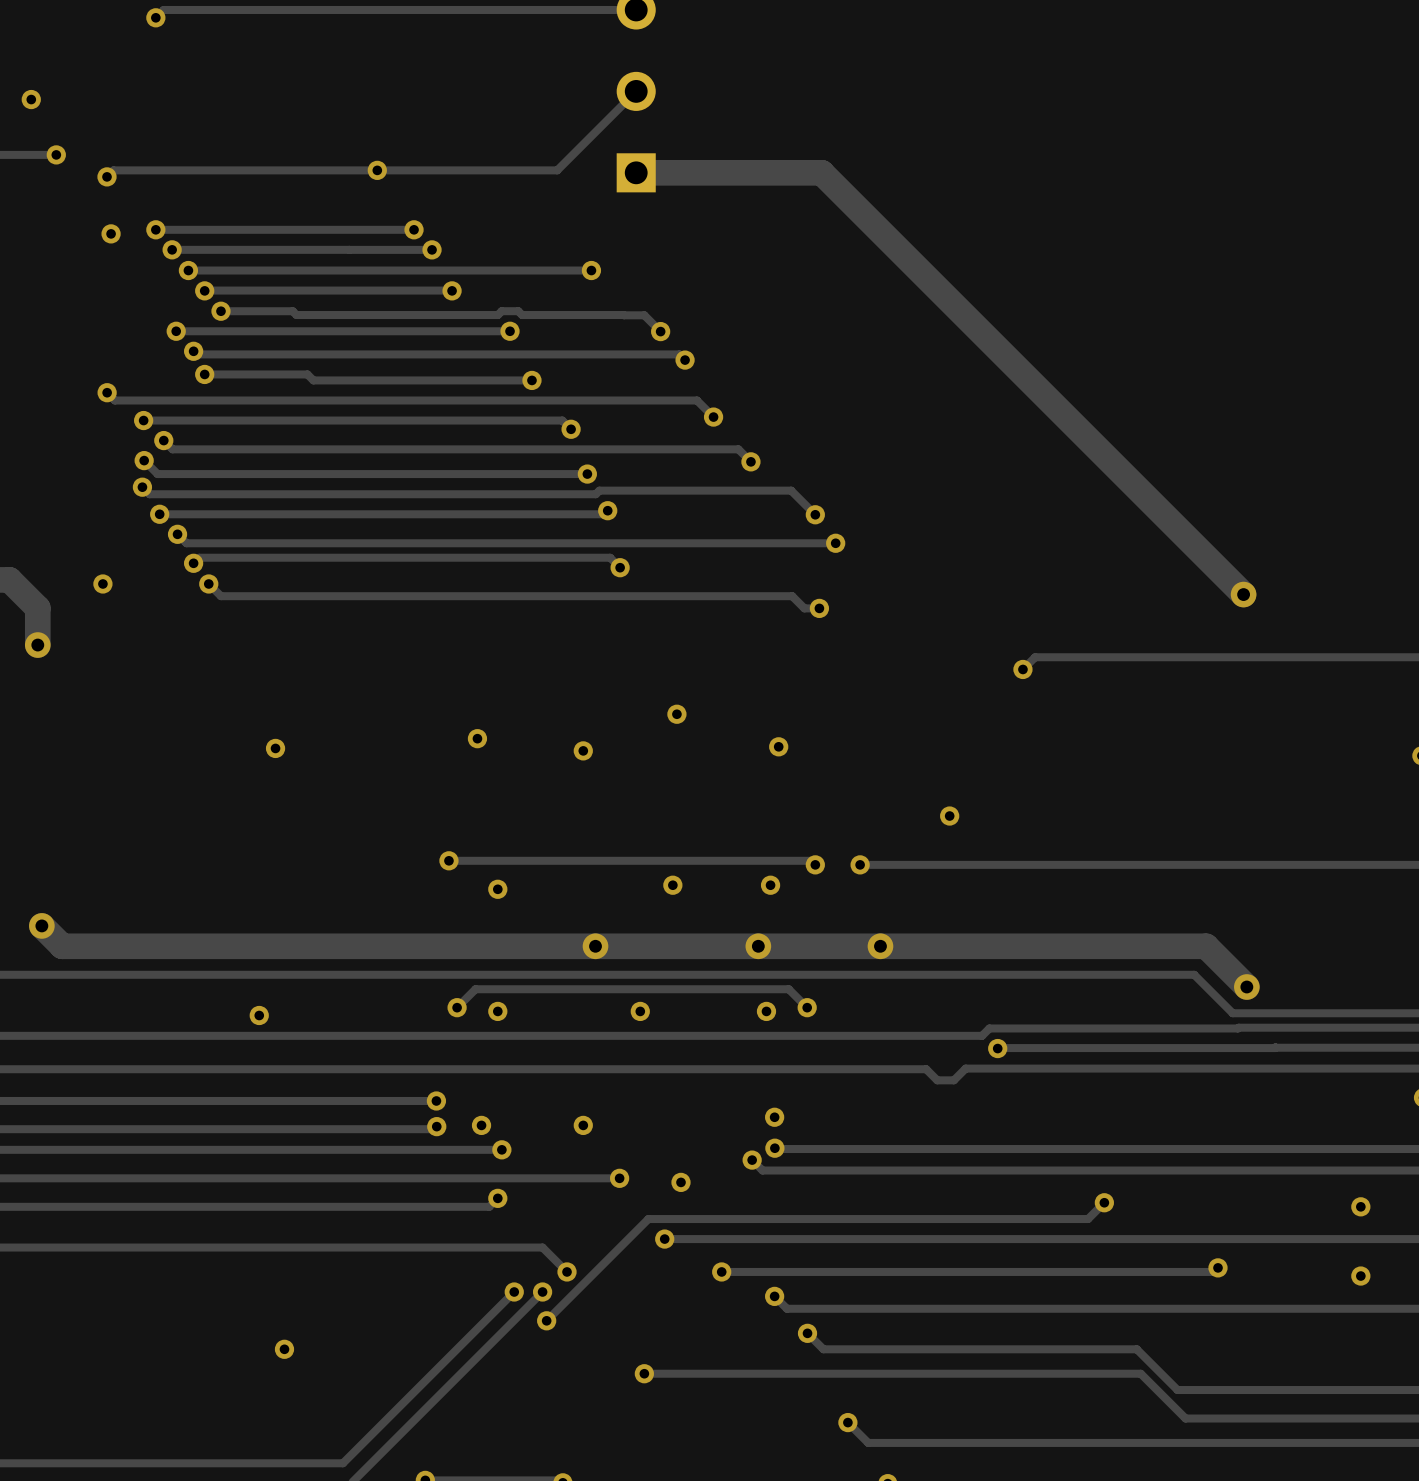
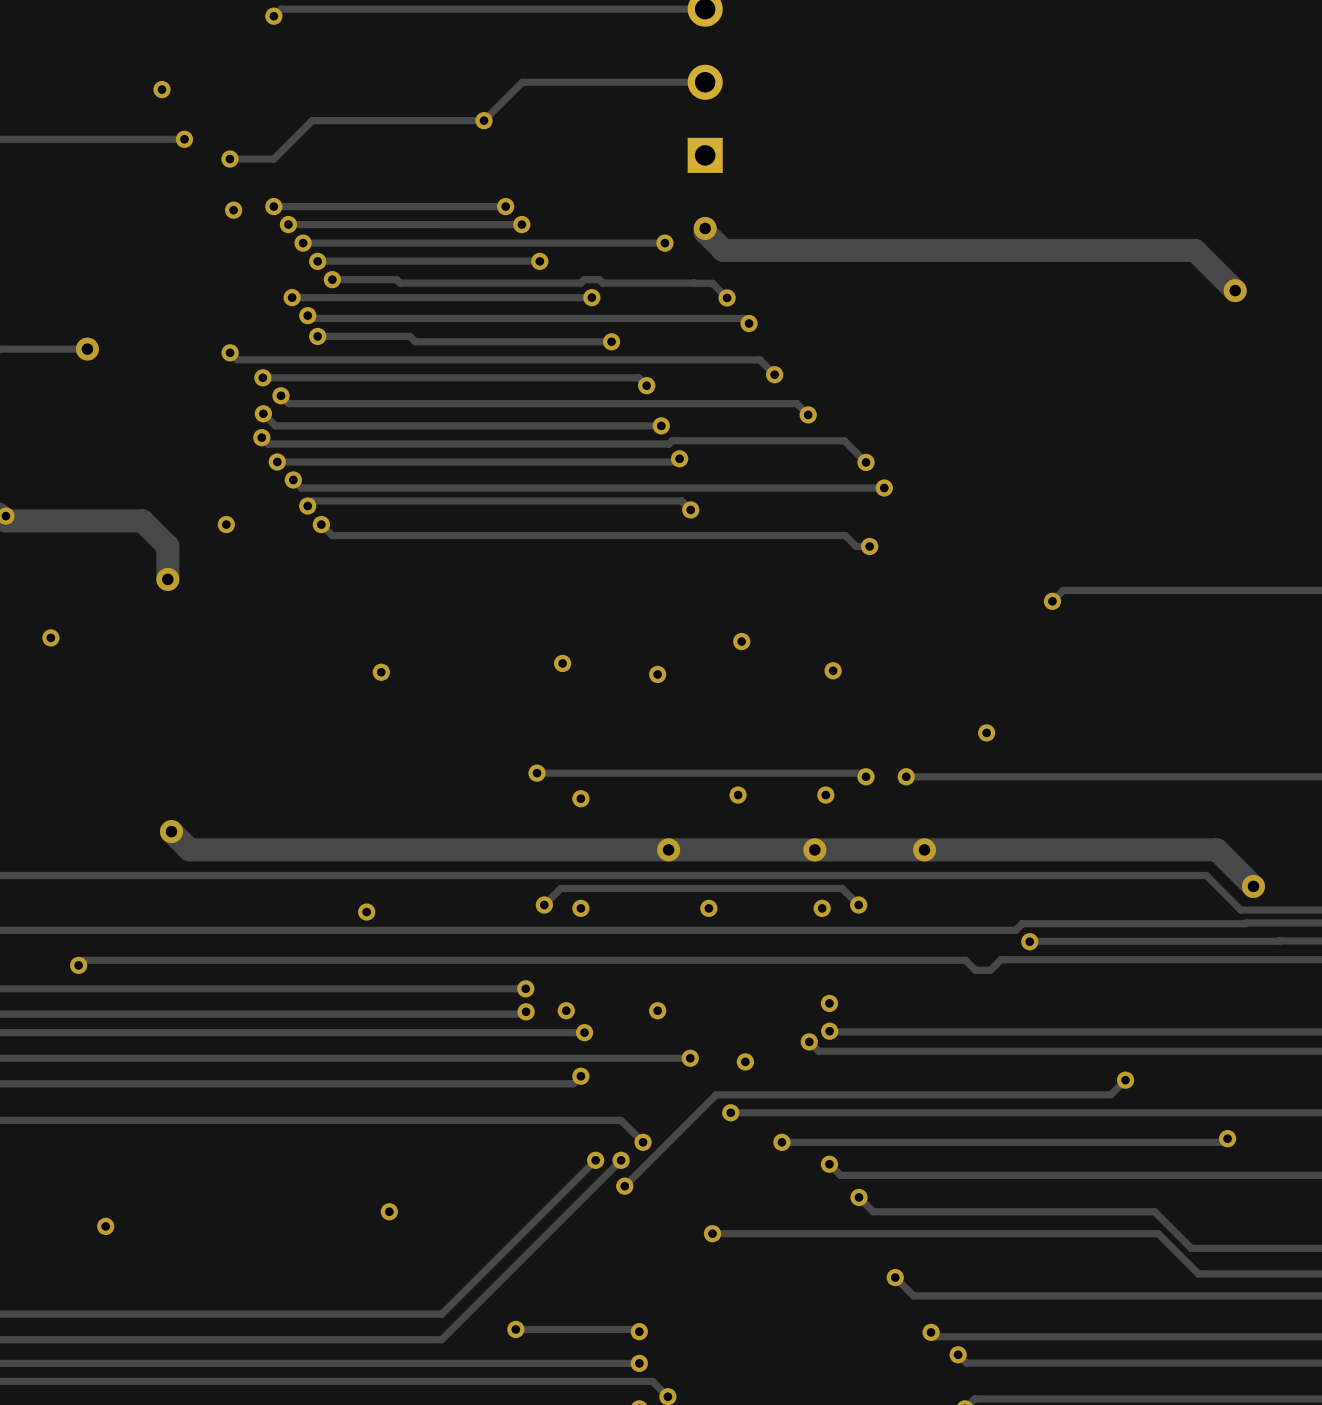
track: (636, 91) (557, 170) (113, 170) (107, 176) -> (484, 120) (312, 120) (273, 159) (229, 159)
track: none -> (705, 82) (522, 82) (484, 120)
via position: (377, 170) -> (484, 120)
track: (636, 172) (821, 172) (1243, 594) -> none
track: none -> (705, 228) (705, 232) (723, 250) (1195, 250) (1235, 290)
via: none -> (705, 228)
via: none -> (1235, 290)
via: (1243, 594) -> none

